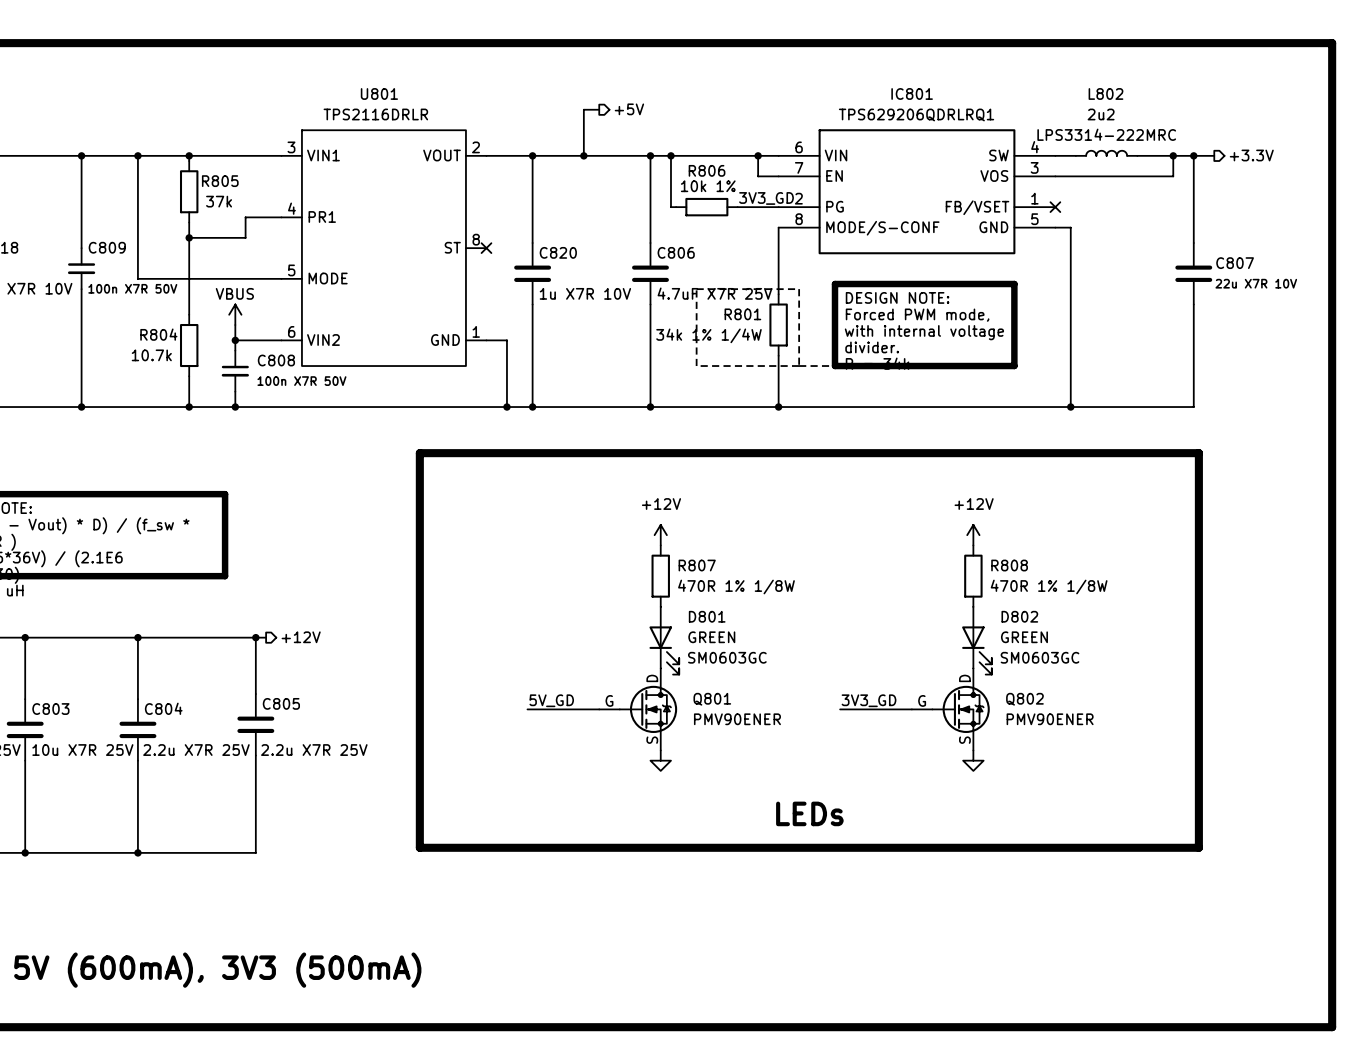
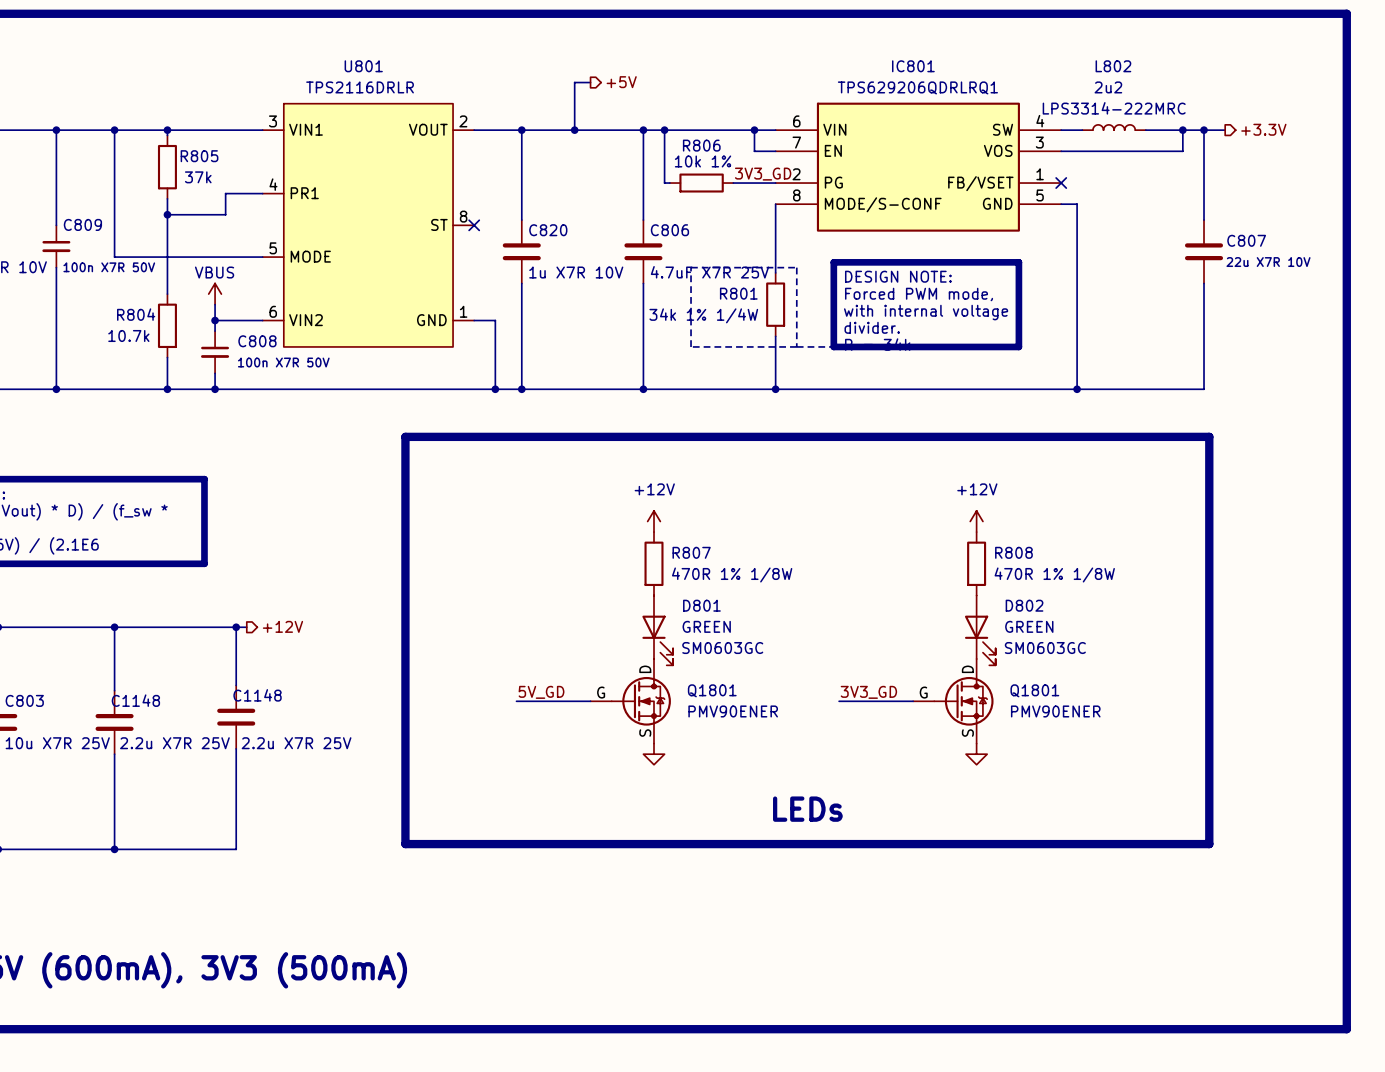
Q801 name: Q801 (712, 699) -> Q1801 (712, 690)
Q802 name: Q802 (1024, 699) -> Q1801 (1034, 690)
C805 name: C805 (281, 703) -> C1148 (257, 695)
C804 name: C804 (163, 708) -> C1148 (135, 700)

